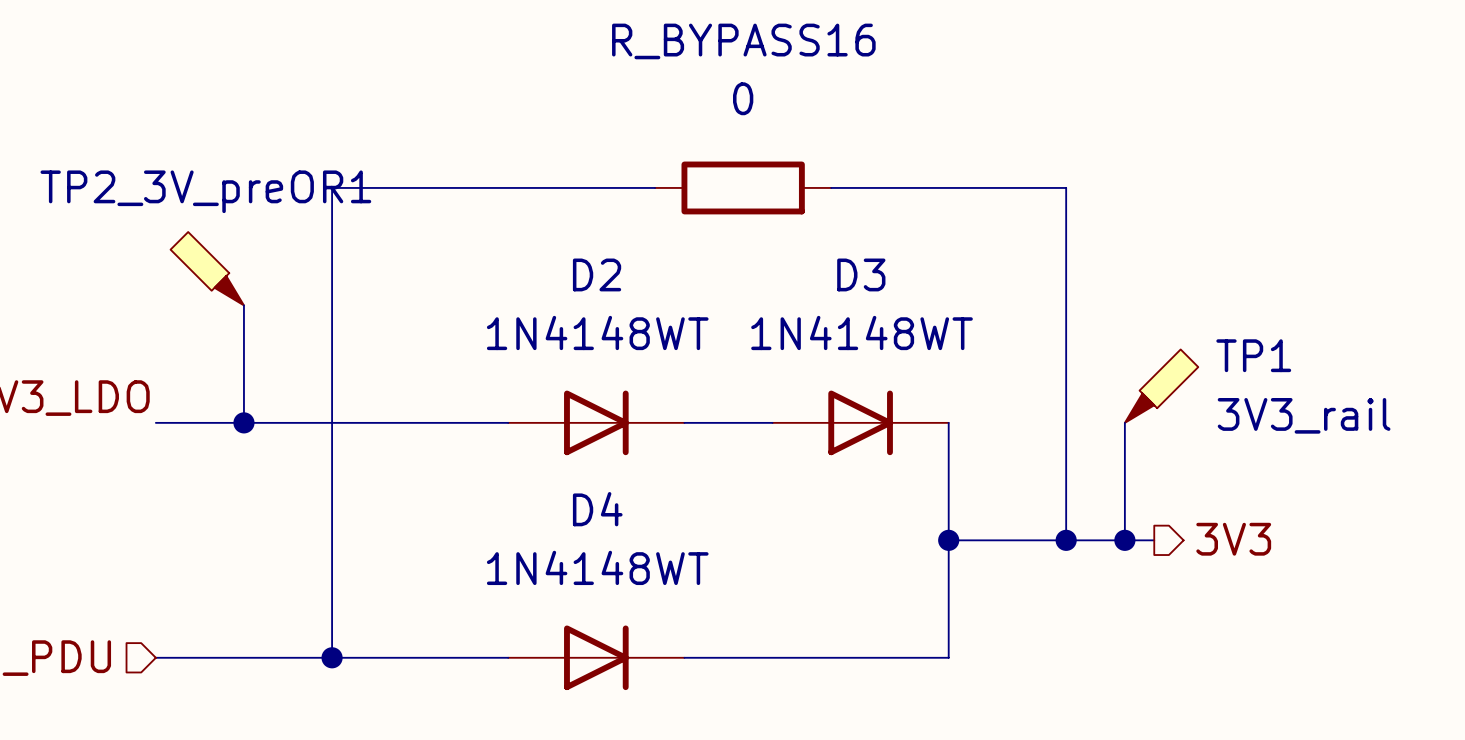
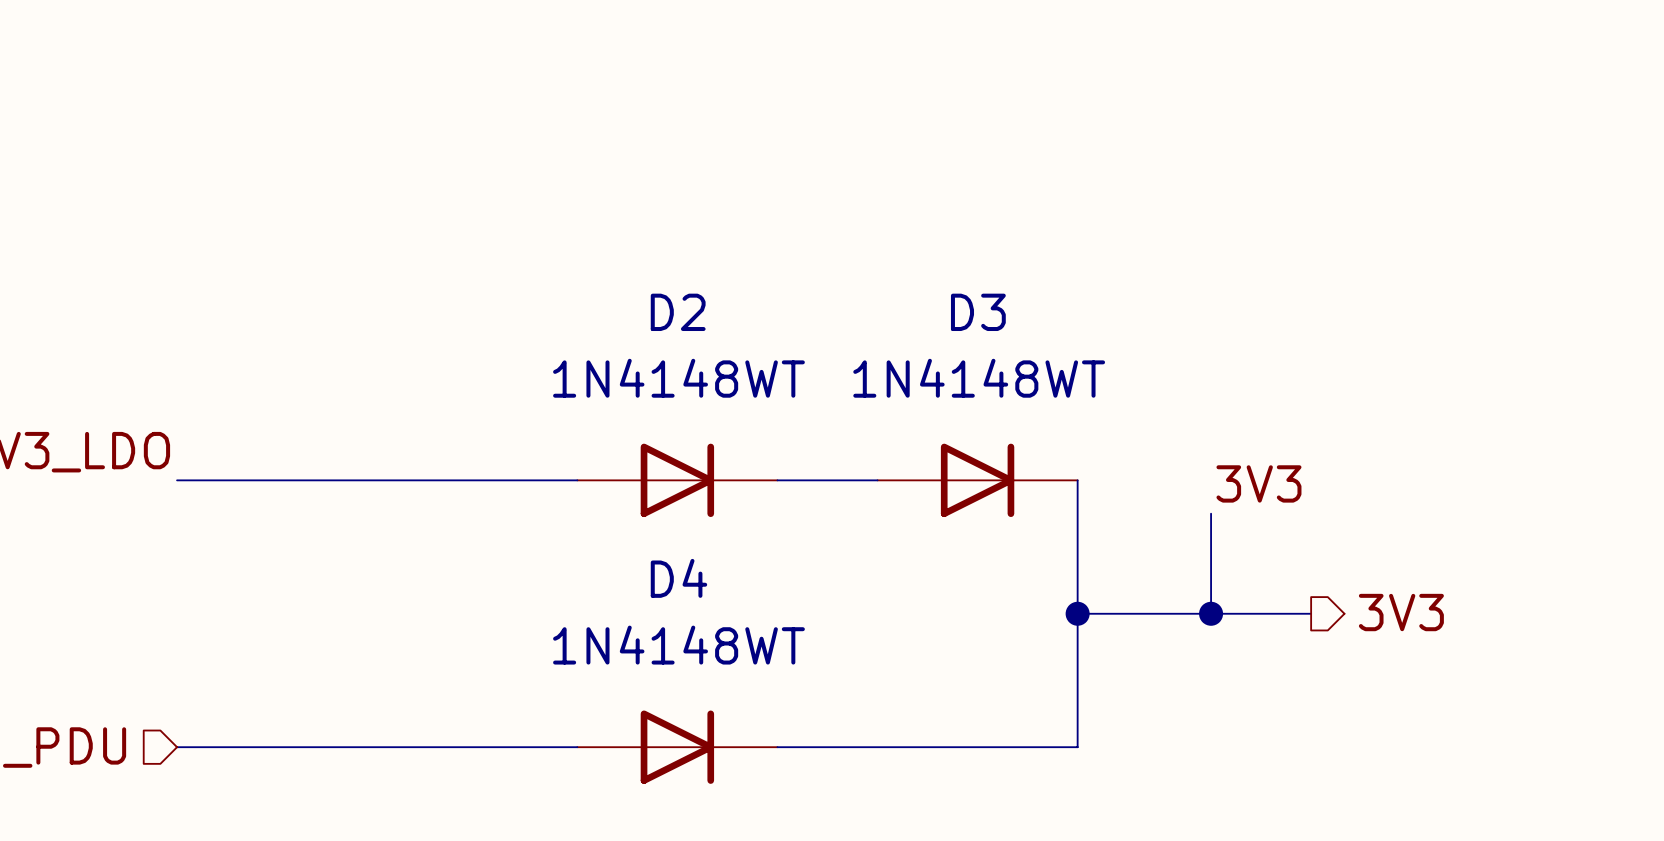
wire: (655, 187) (332, 187) (332, 657) -> none
R_BYPASS16: 0 (743, 187) -> none
wire: (831, 187) (1066, 187) (1066, 452) -> none
TP2_3V_preOR1: (207, 268) -> none
wire: (243, 305) (243, 422) -> none
TP1: 3V3_rail (1161, 386) -> none
junction: (243, 422) -> none
wire: (1124, 422) (1124, 540) -> none
label: none -> 3V3 (1258, 483)
junction: (1124, 540) -> none
junction: (332, 657) -> none

